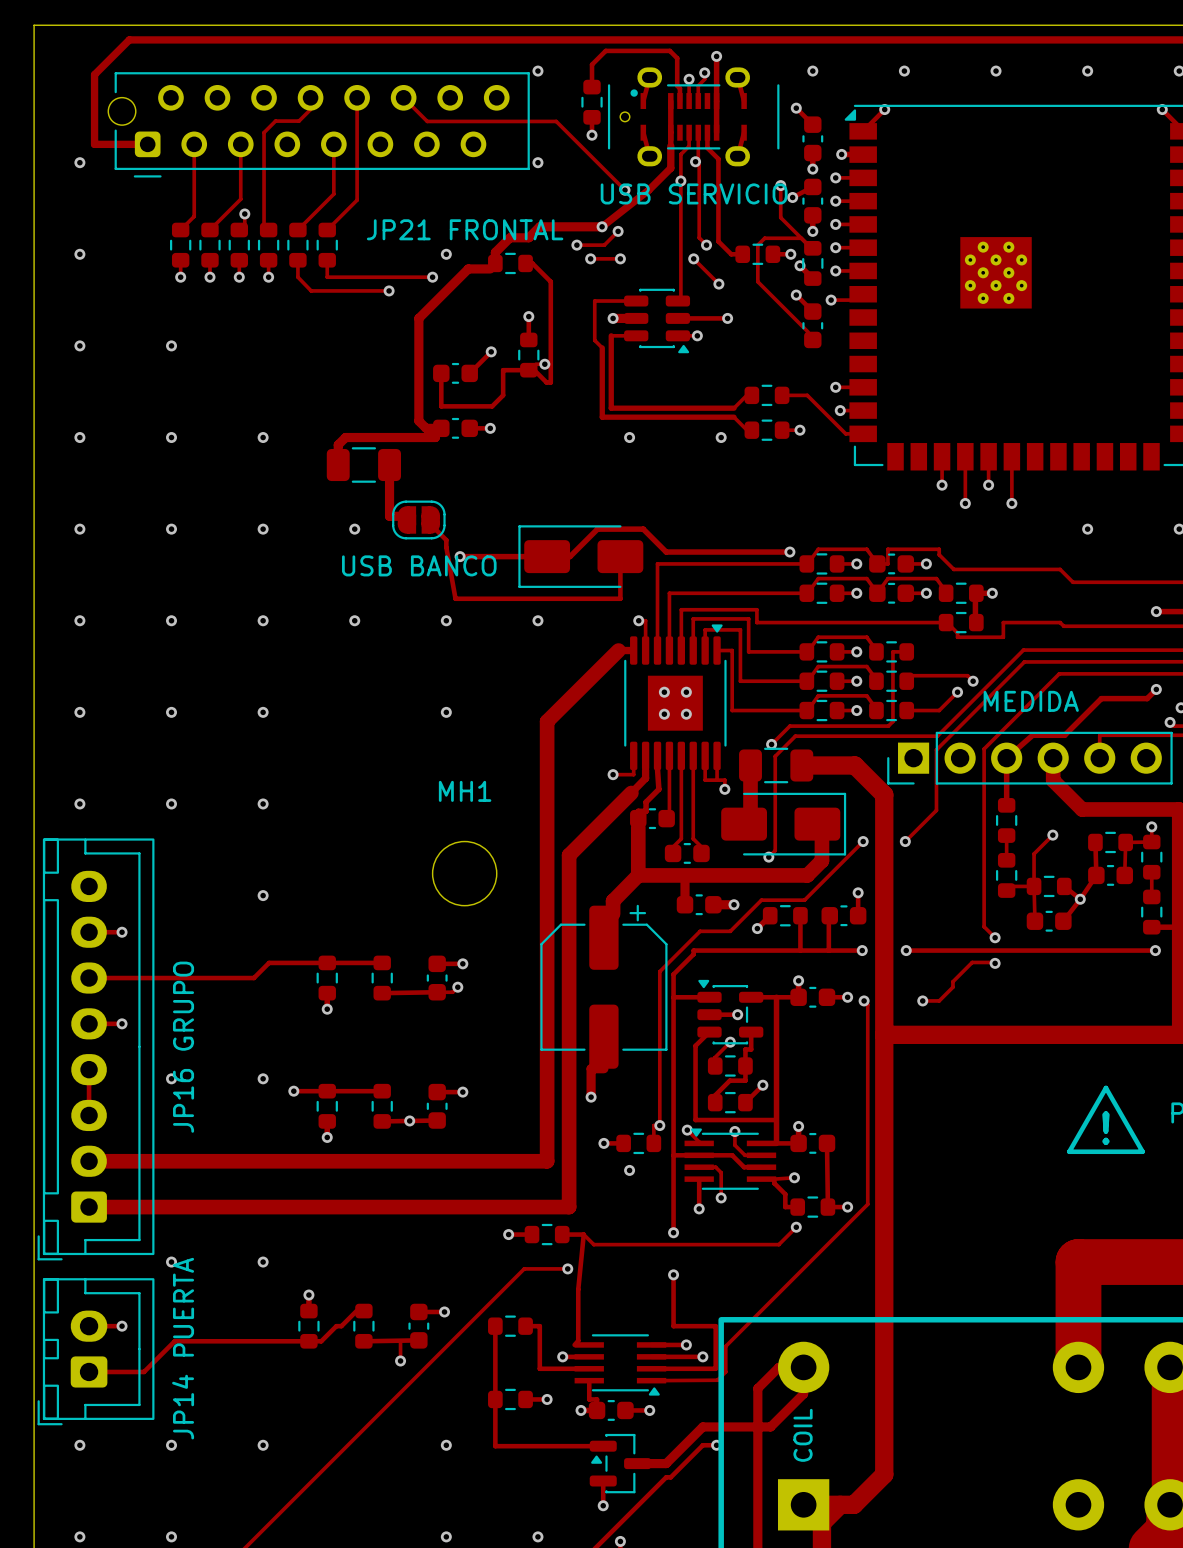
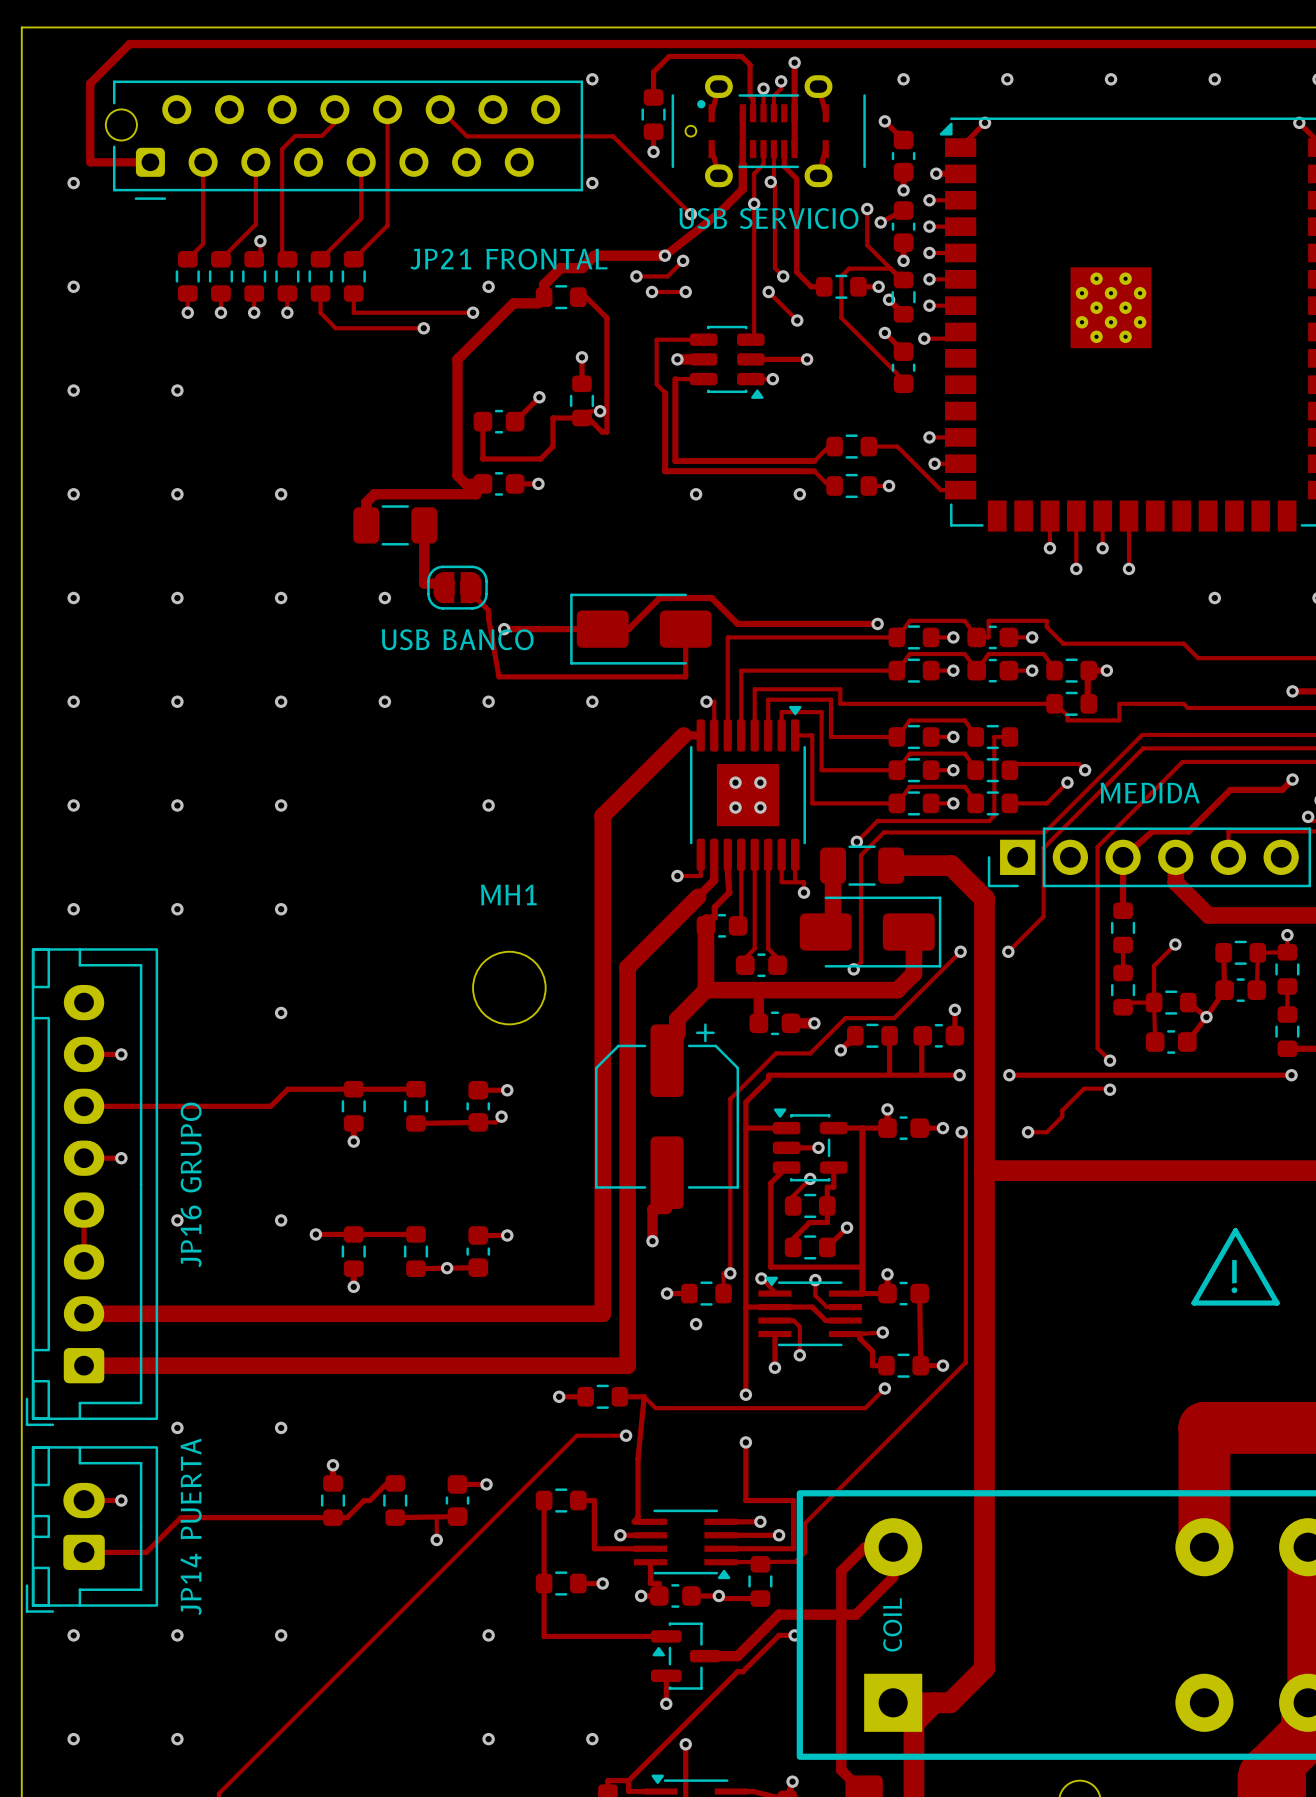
part: none -> (760, 1581)
track: none -> (721, 1598) (760, 1598)

